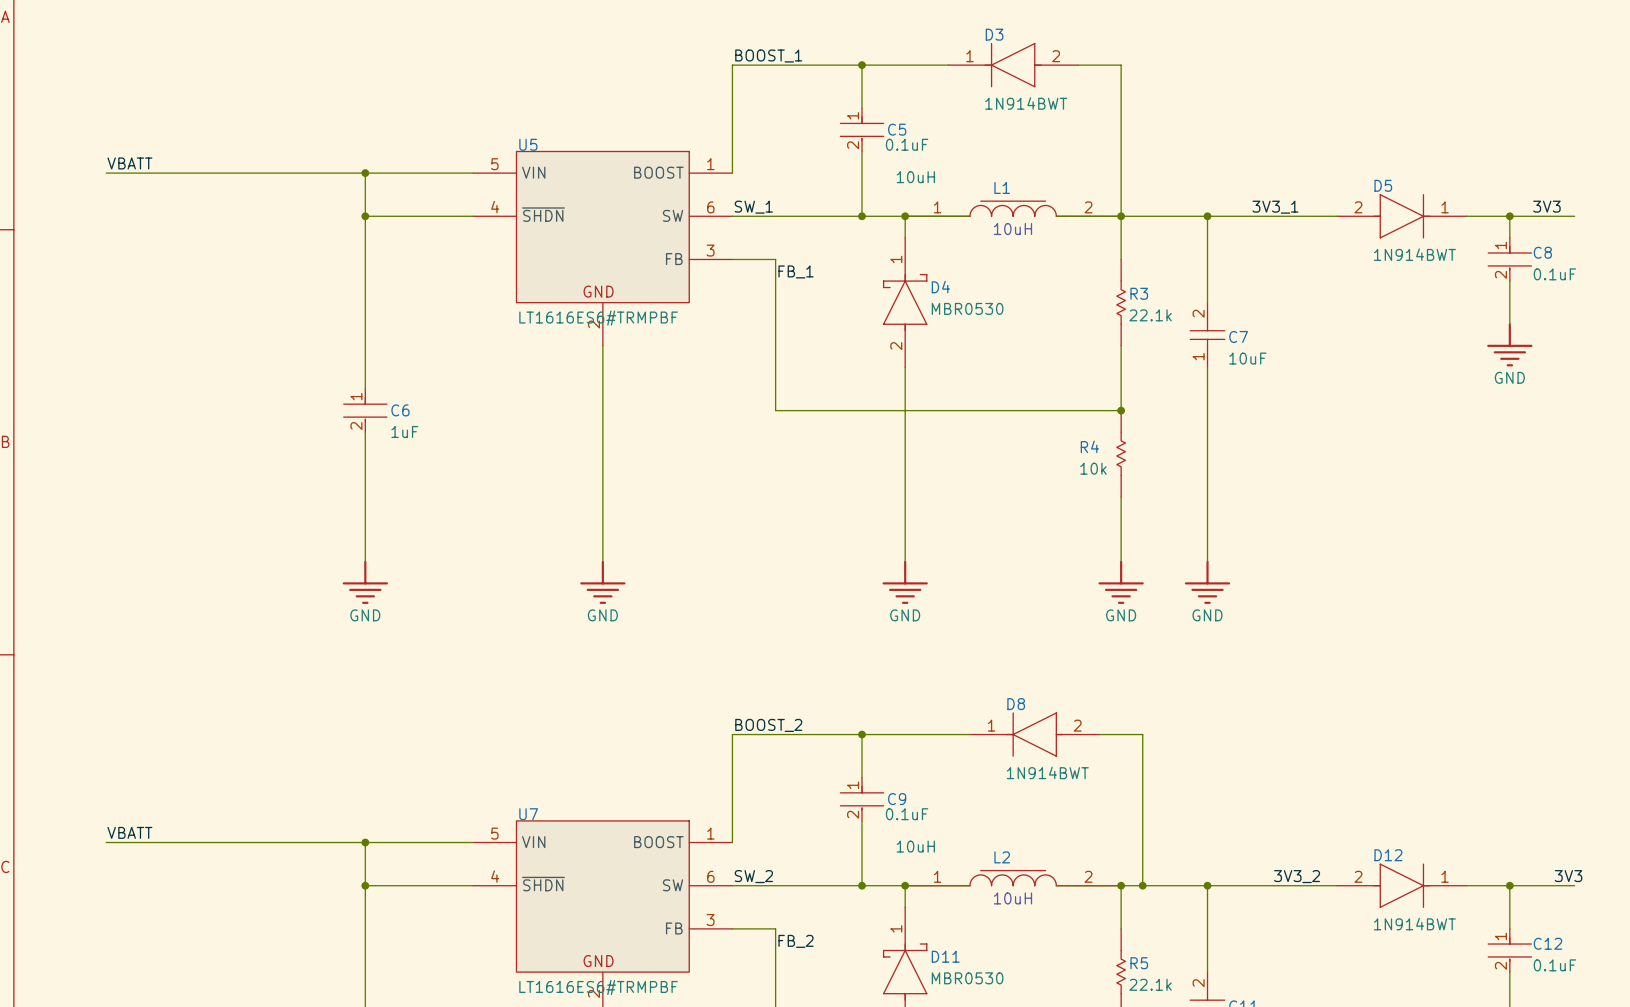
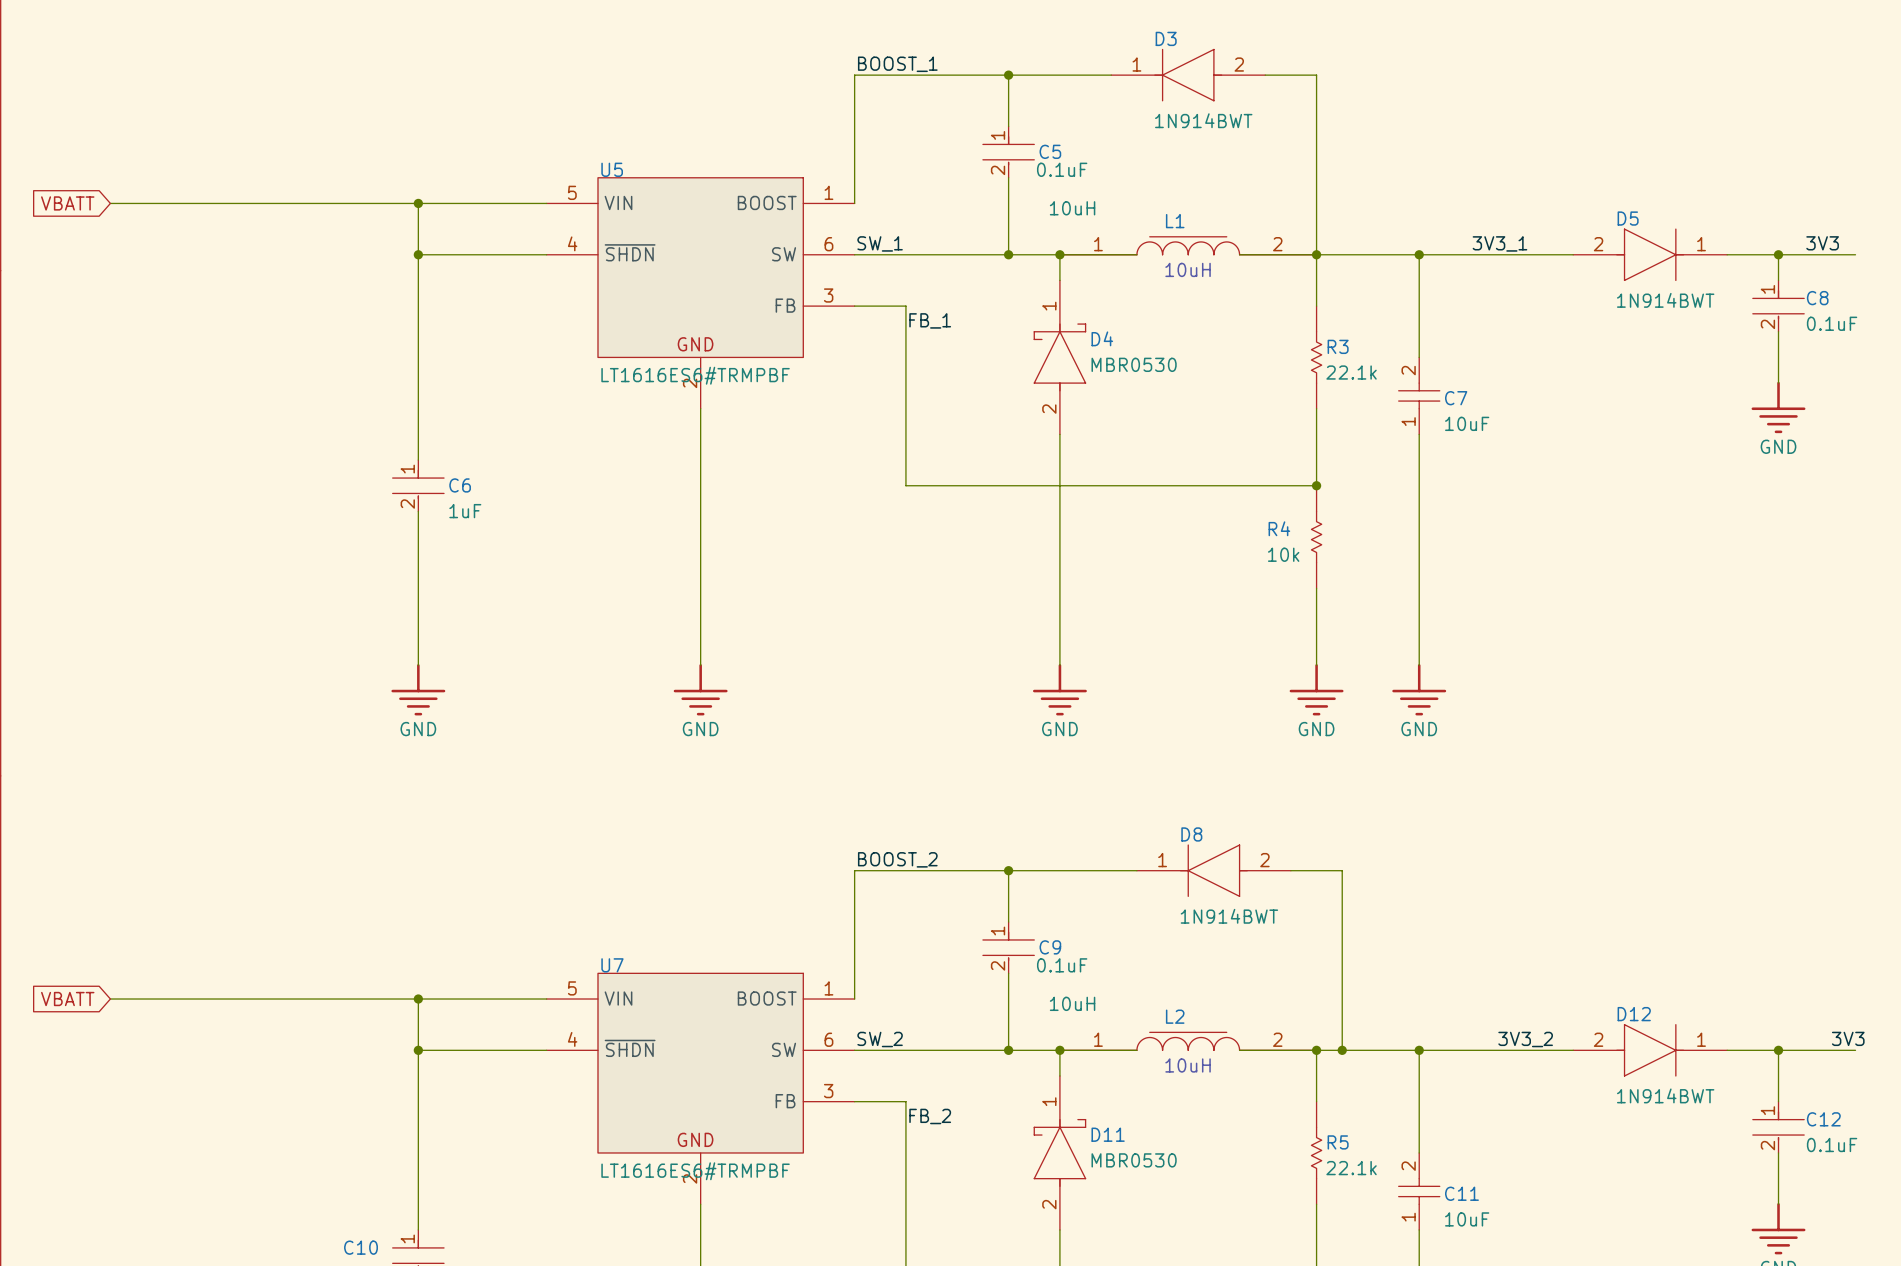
label: VBATT (129, 163) -> none
global label: none -> VBATT (67, 203)
label: VBATT (129, 832) -> none
global label: none -> VBATT (67, 999)

